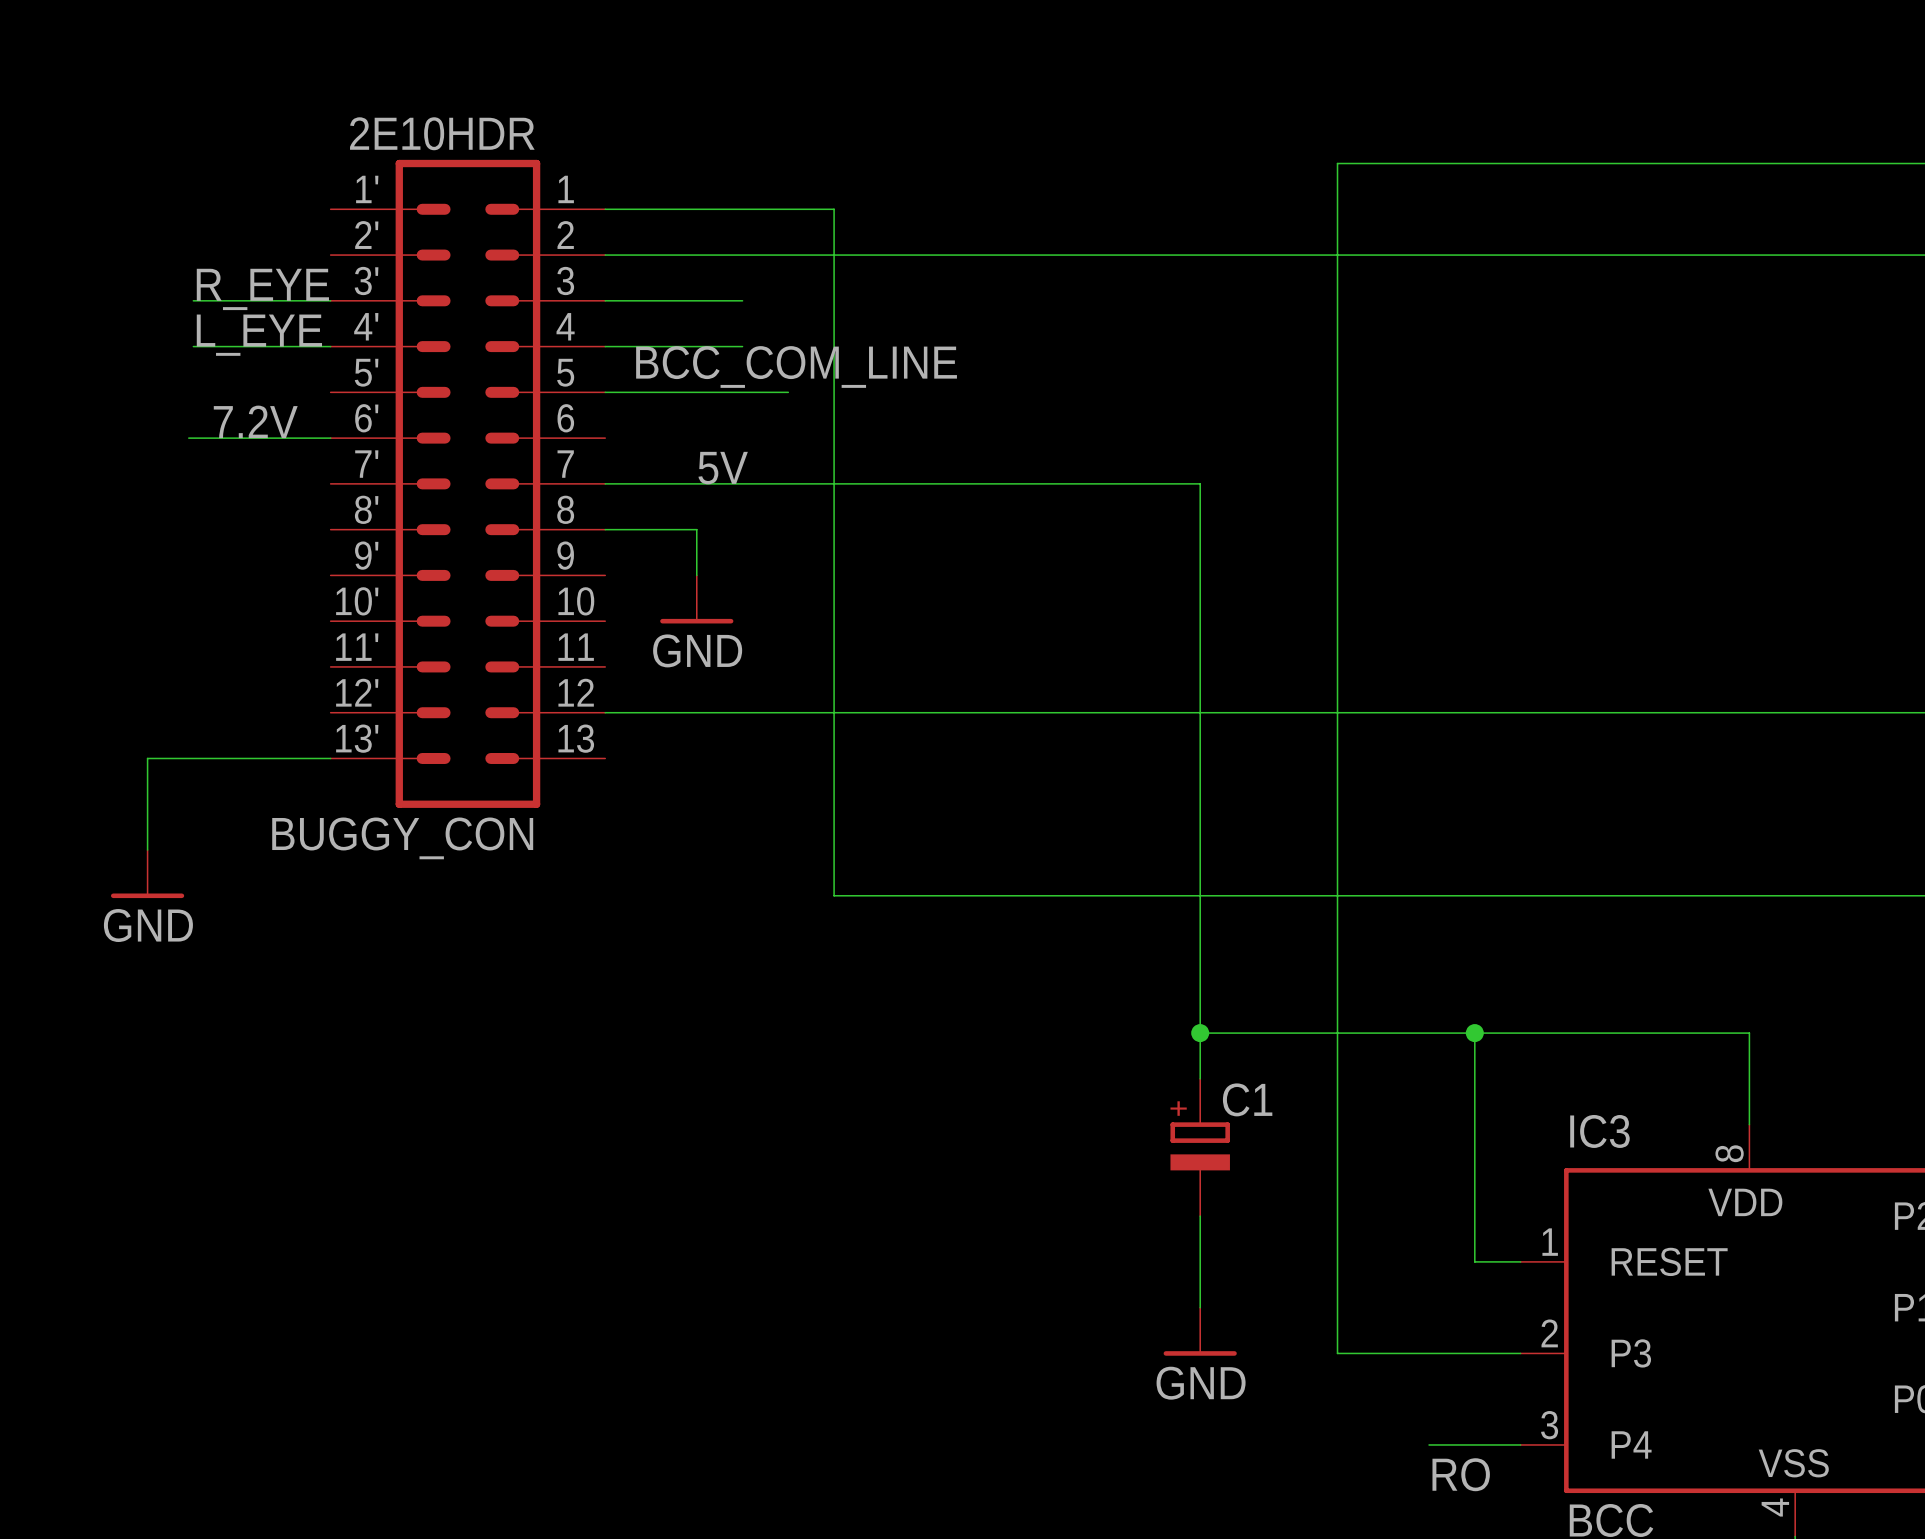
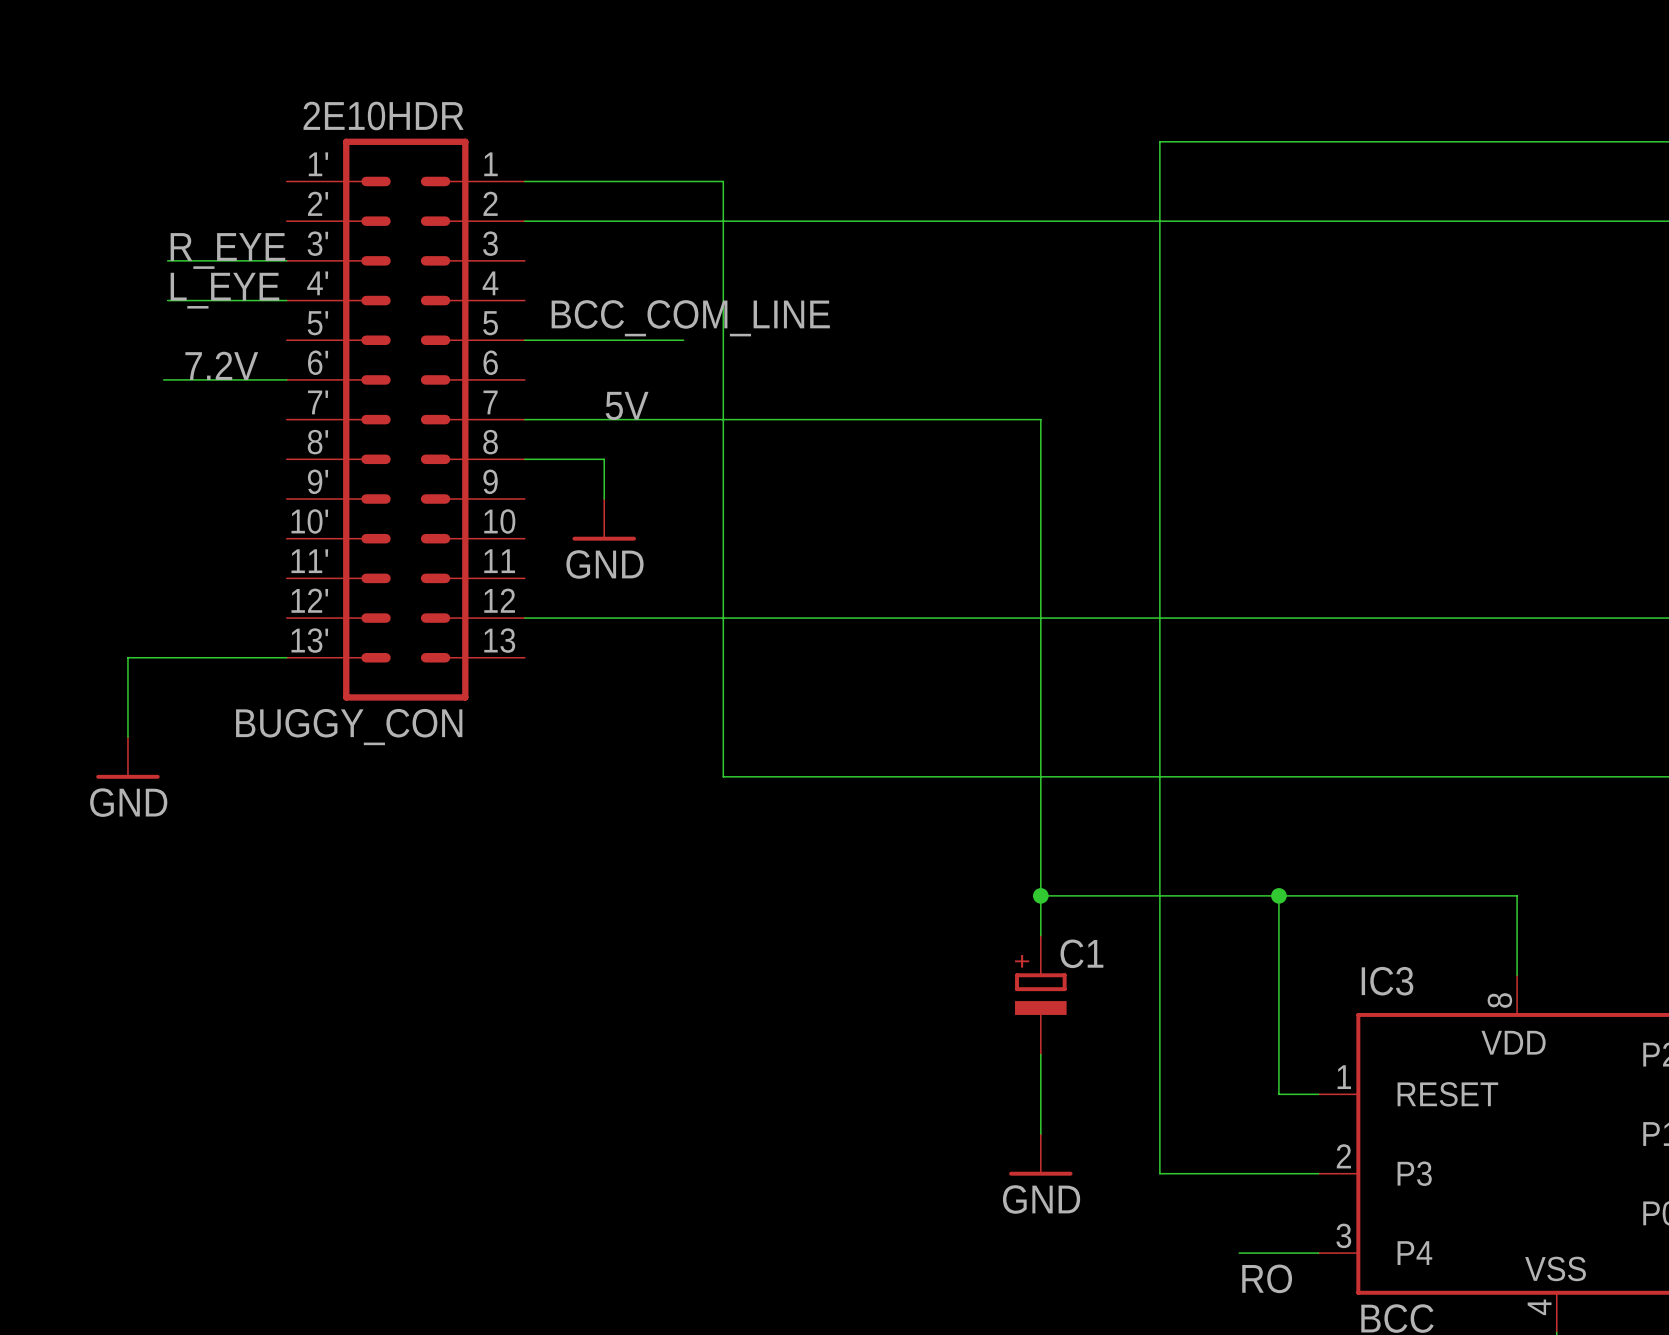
wire: (605, 300) (742, 300) -> none
wire: (605, 346) (742, 346) -> none

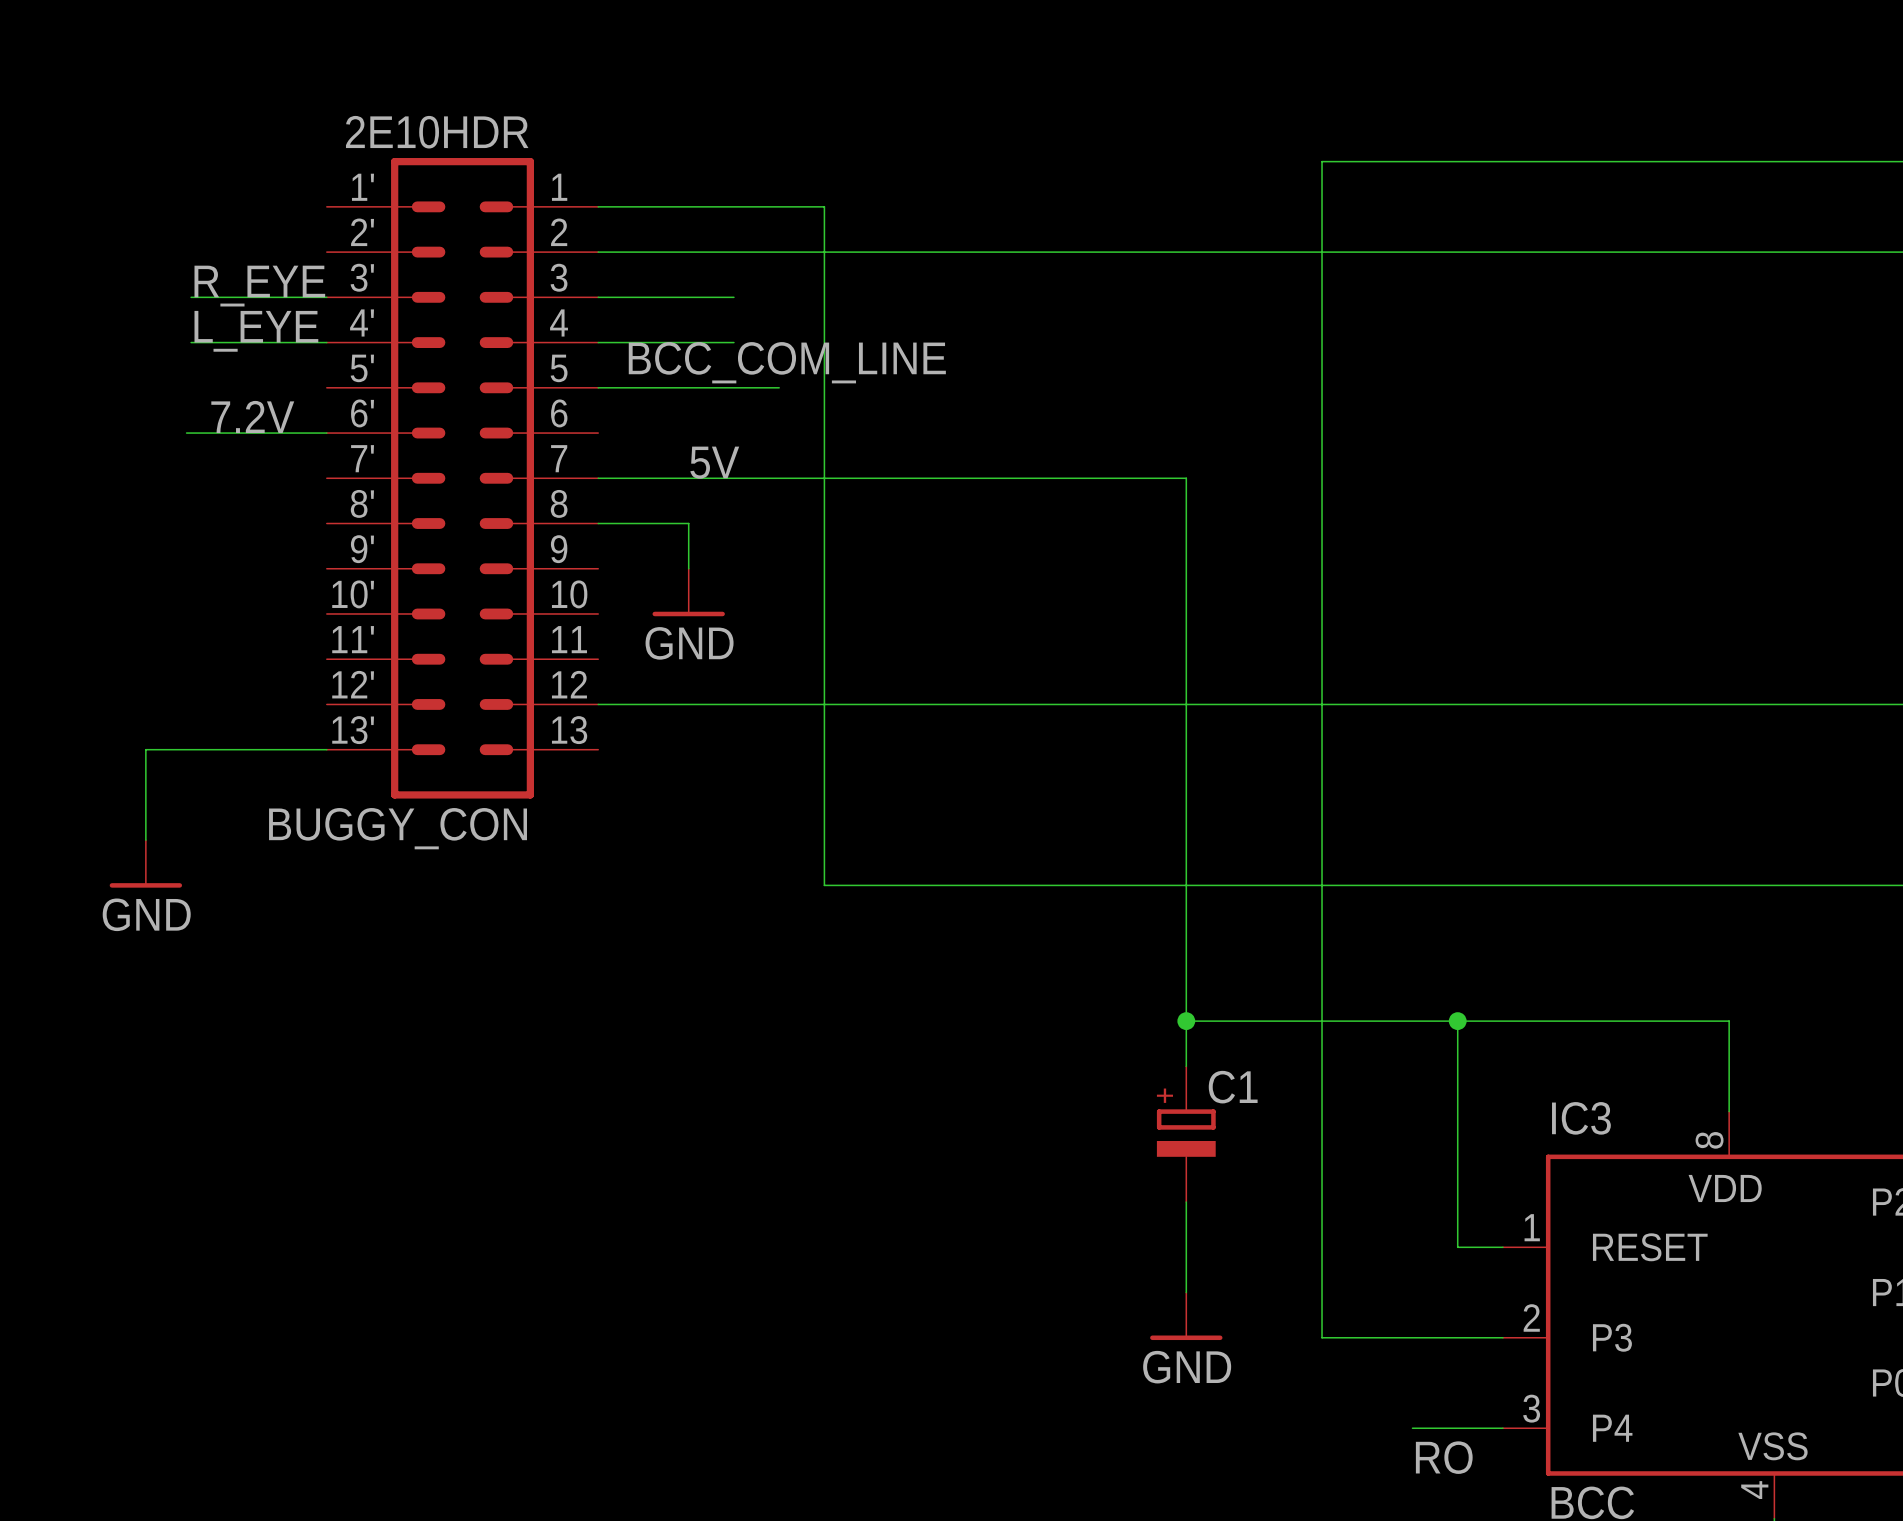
wire: none -> (598, 297) (733, 297)
wire: none -> (598, 342) (733, 342)

